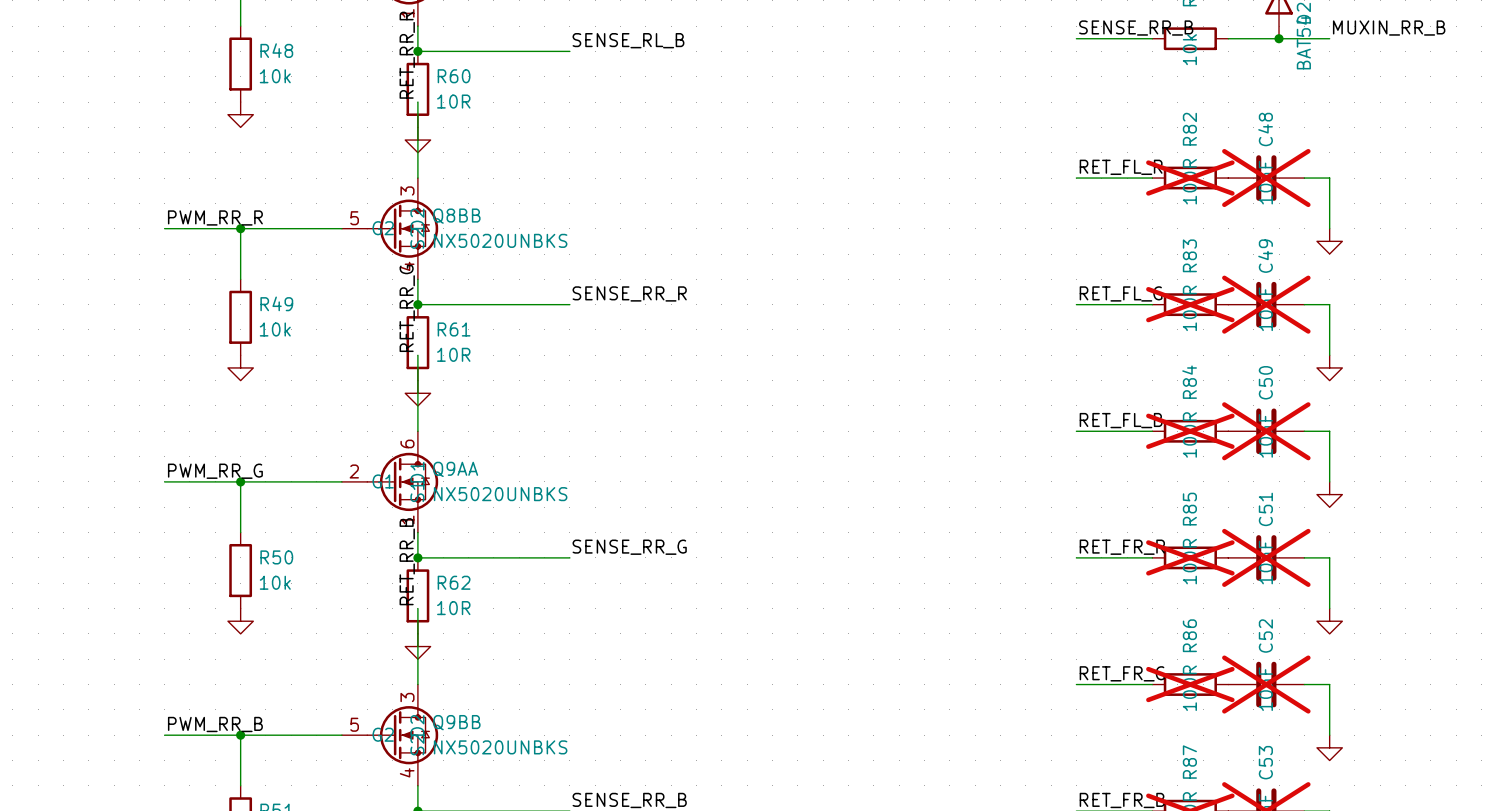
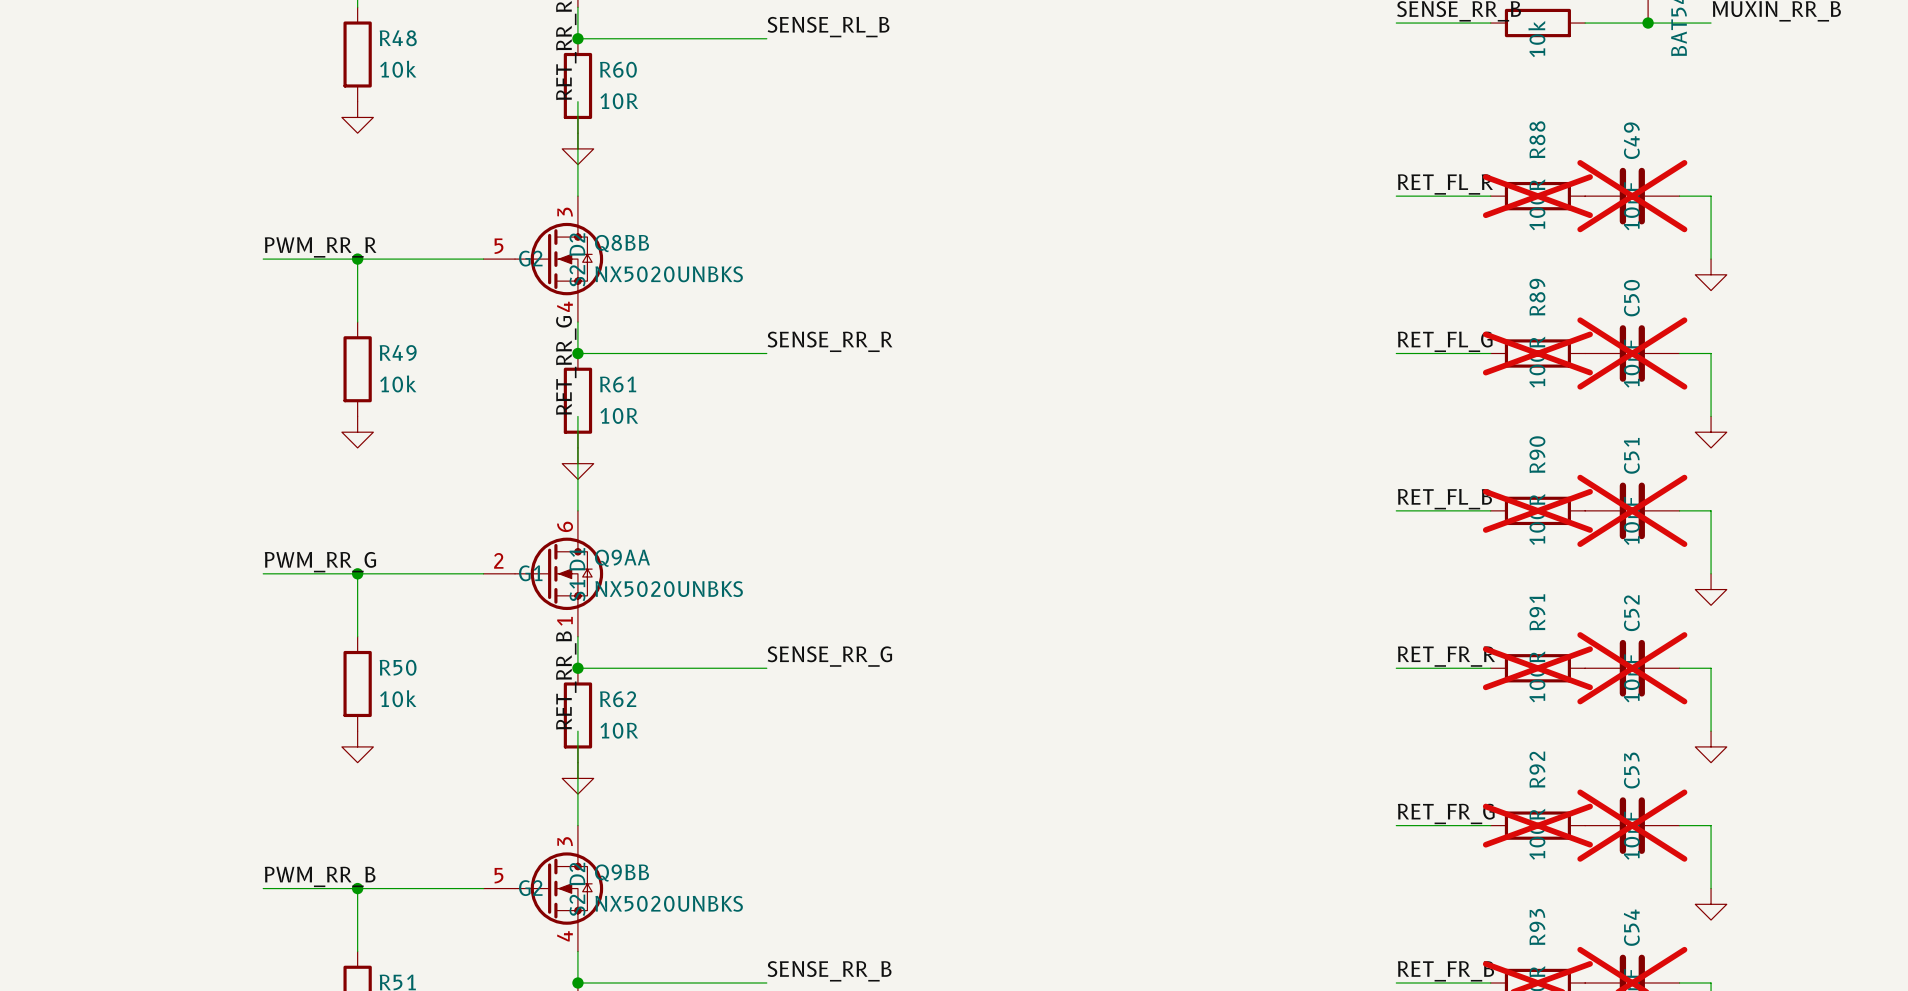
R82 name: R82 (1189, 129) -> R88 (1537, 139)
C48 name: C48 (1265, 129) -> C49 (1631, 140)
R83 name: R83 (1189, 255) -> R89 (1537, 297)
C49 name: C49 (1265, 256) -> C50 (1631, 298)
R84 name: R84 (1189, 382) -> R90 (1537, 454)
C50 name: C50 (1265, 382) -> C51 (1631, 455)
R85 name: R85 (1189, 509) -> R91 (1537, 612)
C51 name: C51 (1265, 509) -> C52 (1631, 613)
R86 name: R86 (1189, 635) -> R92 (1537, 769)
C52 name: C52 (1265, 636) -> C53 (1631, 770)
R87 name: R87 (1189, 762) -> R93 (1537, 927)
C53 name: C53 (1265, 762) -> C54 (1631, 927)

